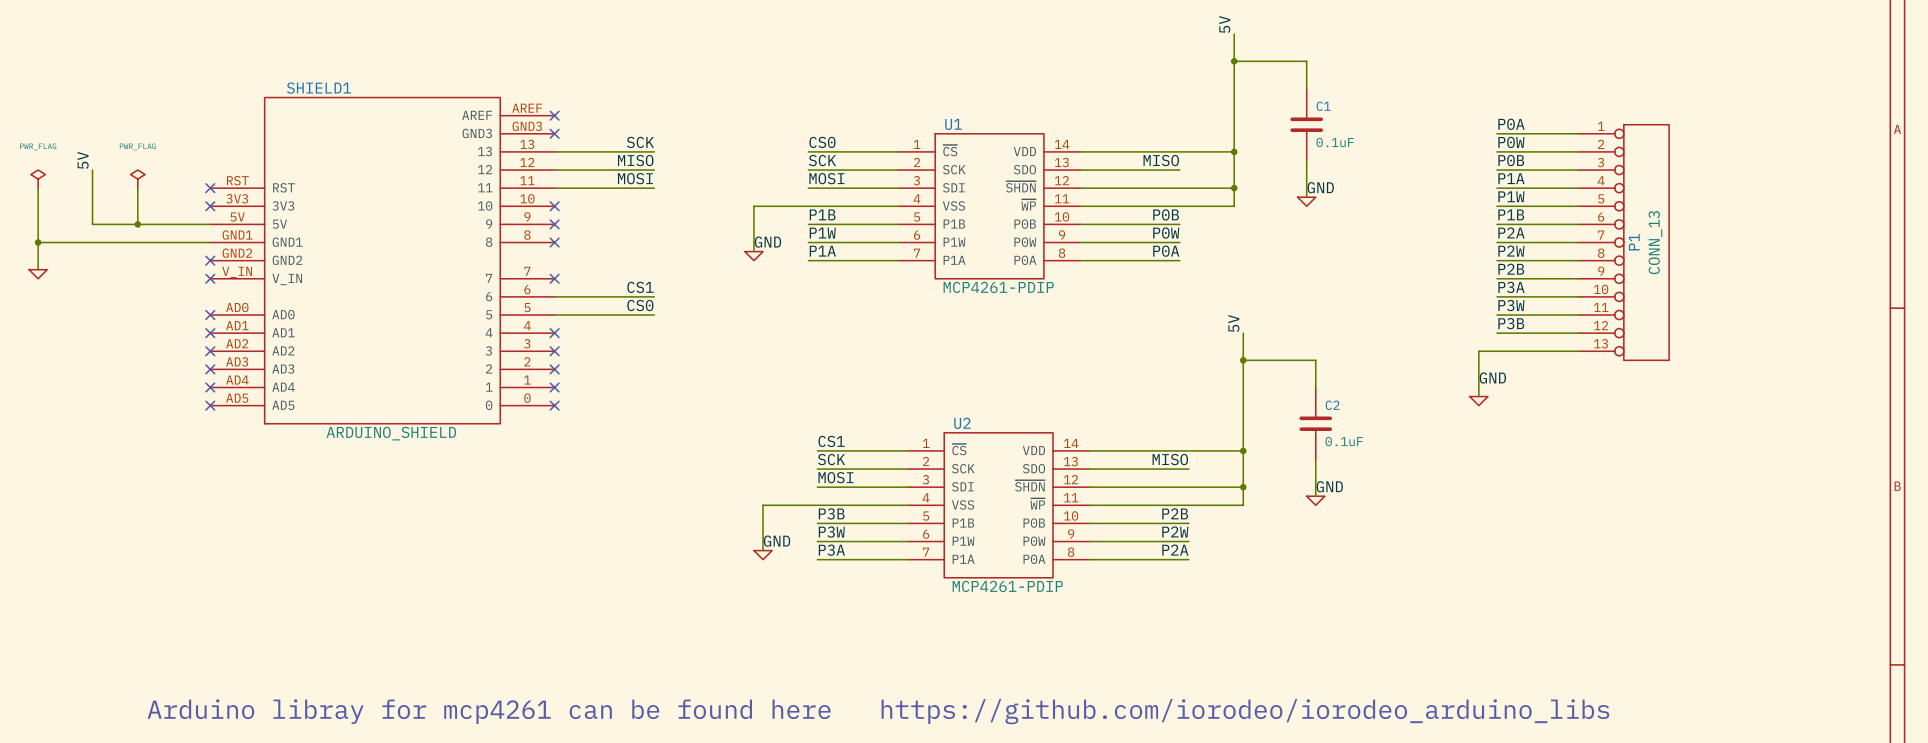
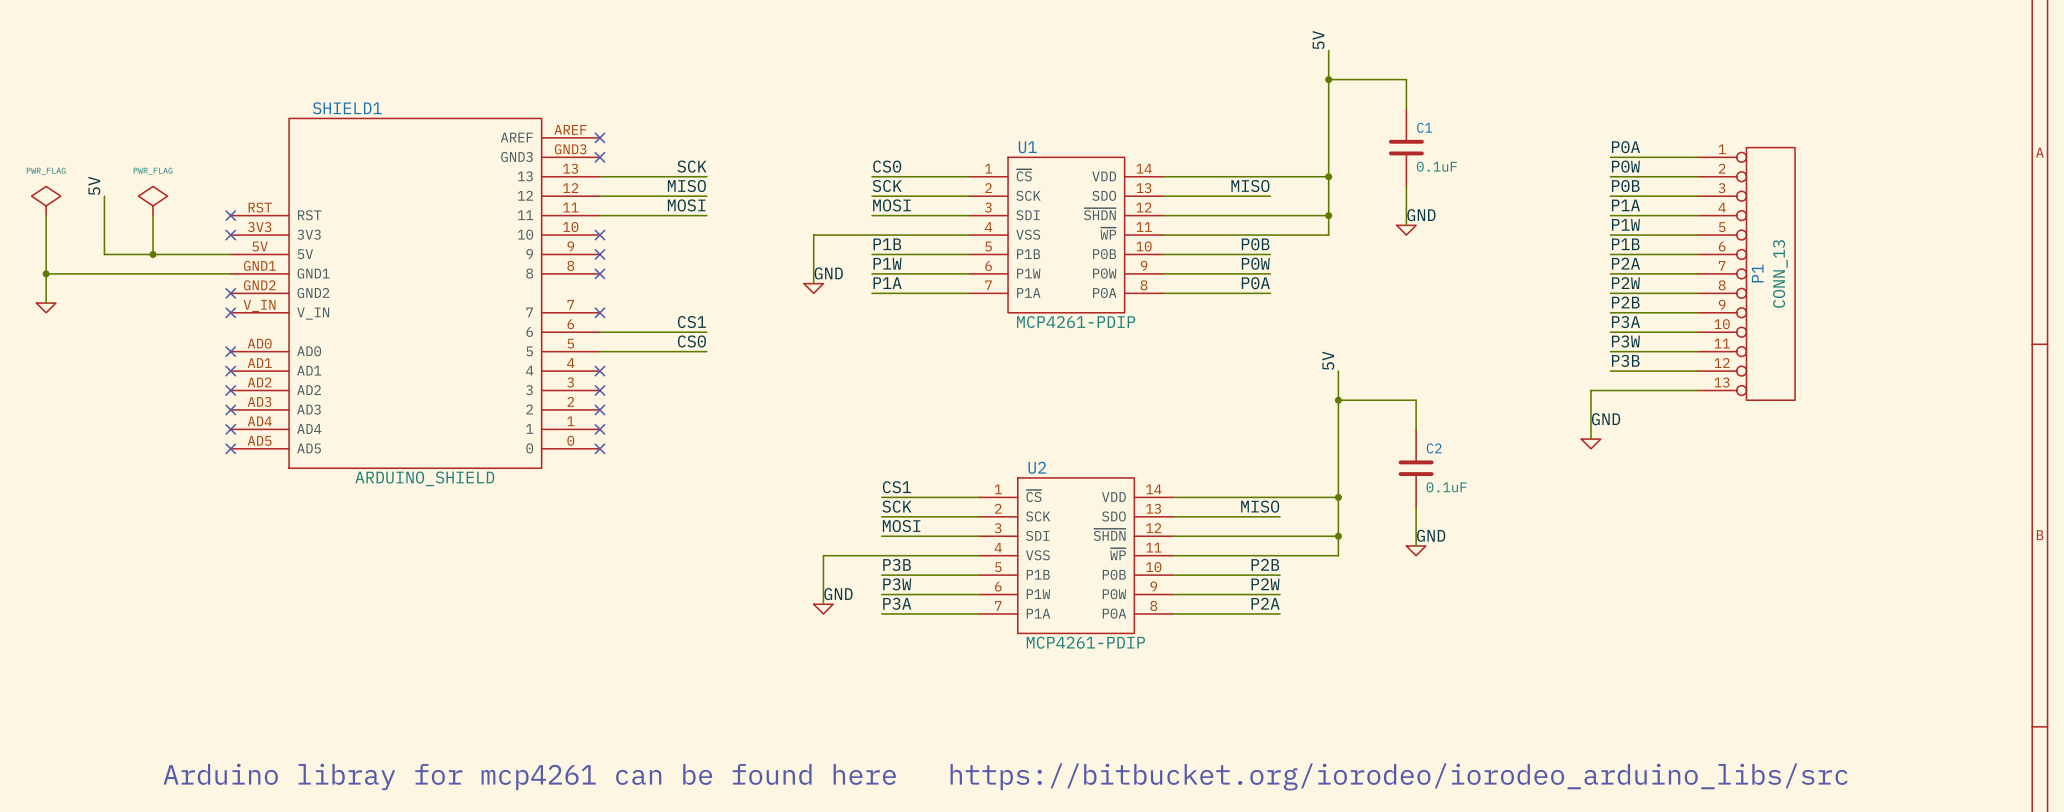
power symbol shape: [30, 170, 46, 189] -> [31, 186, 61, 216]
power symbol shape: [130, 170, 146, 189] -> [138, 186, 168, 216]
text: Arduino libray for mcp4261 can be found here https://github.com/iorodeo/iorodeo_arduino_libs (878, 711) -> Arduino libray for mcp4261 can be found here https://bitbucket.org/iorodeo/iorodeo_arduino_libs/src (1005, 776)

